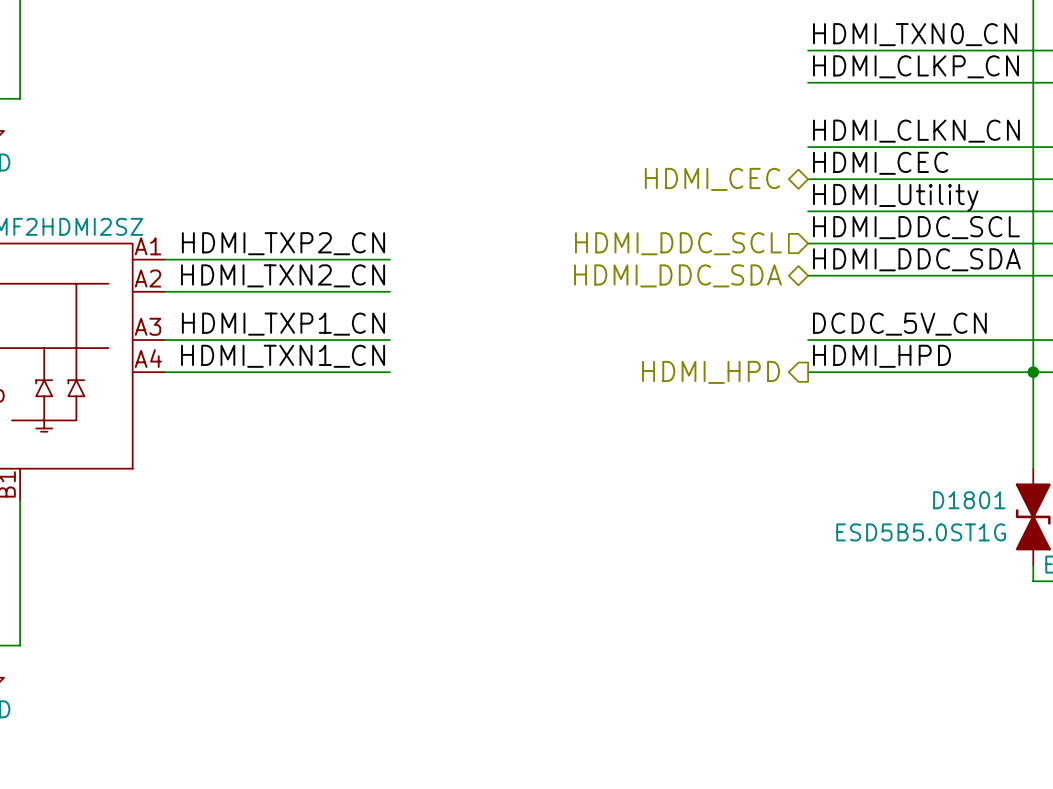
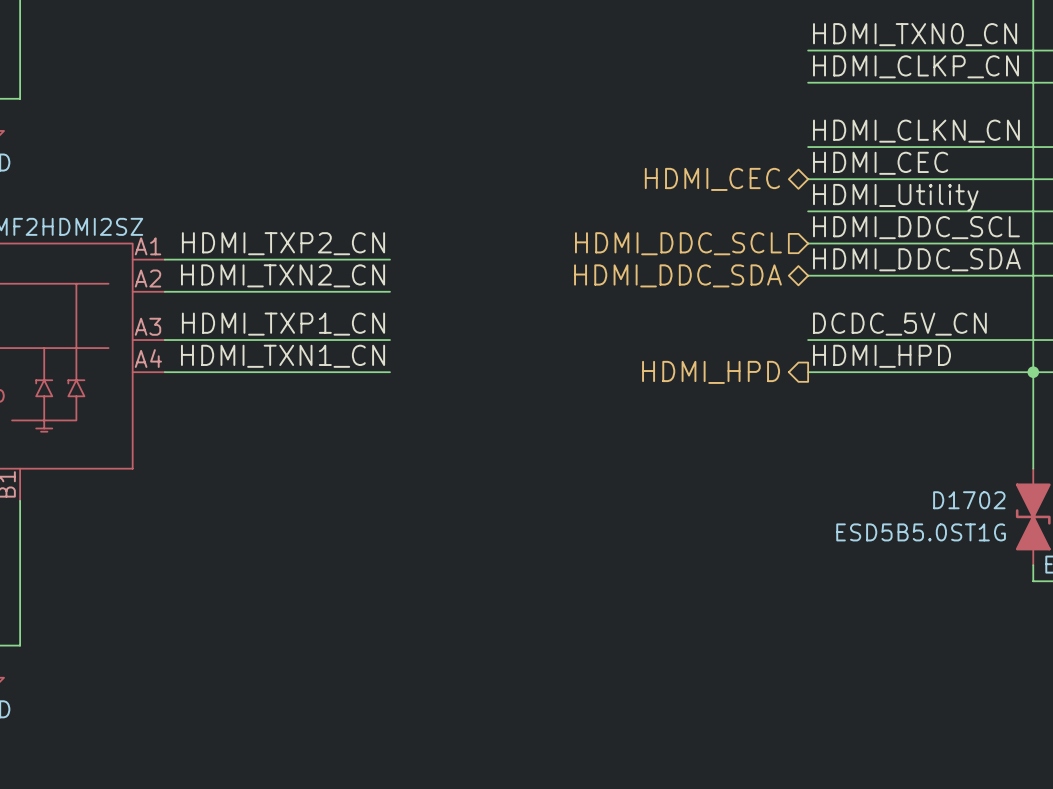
D1801 name: D1801 (969, 500) -> D1702 (969, 500)

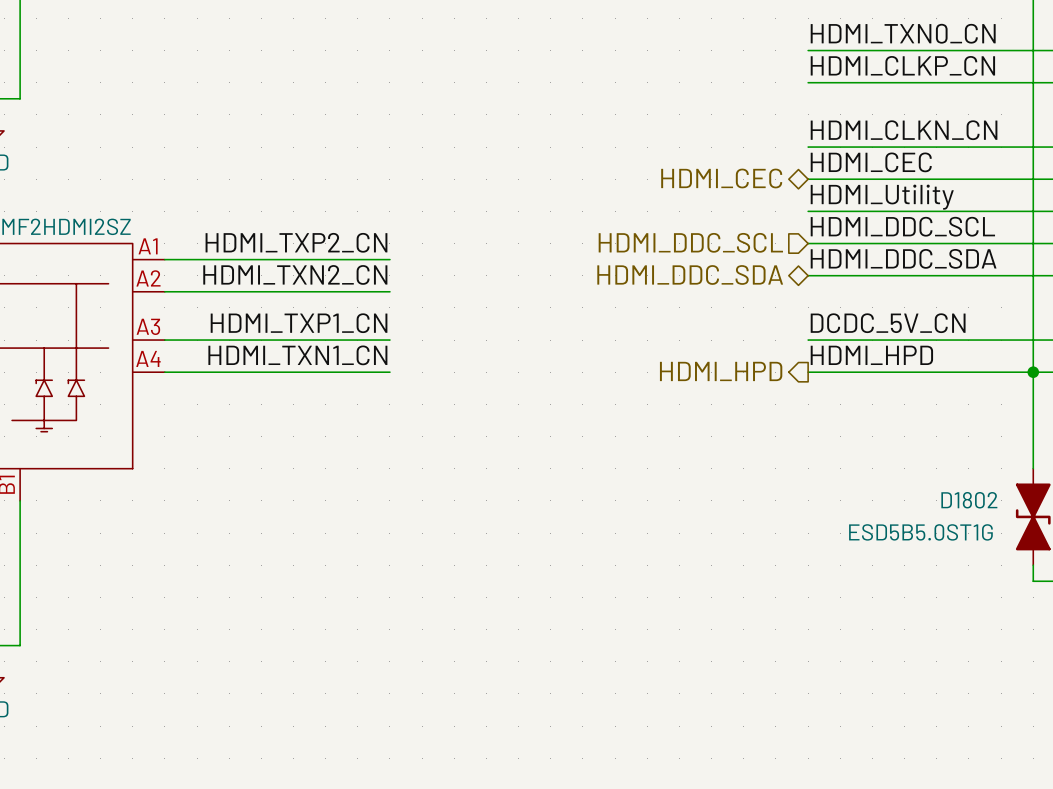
D1702 name: D1702 (969, 500) -> D1802 (969, 500)

